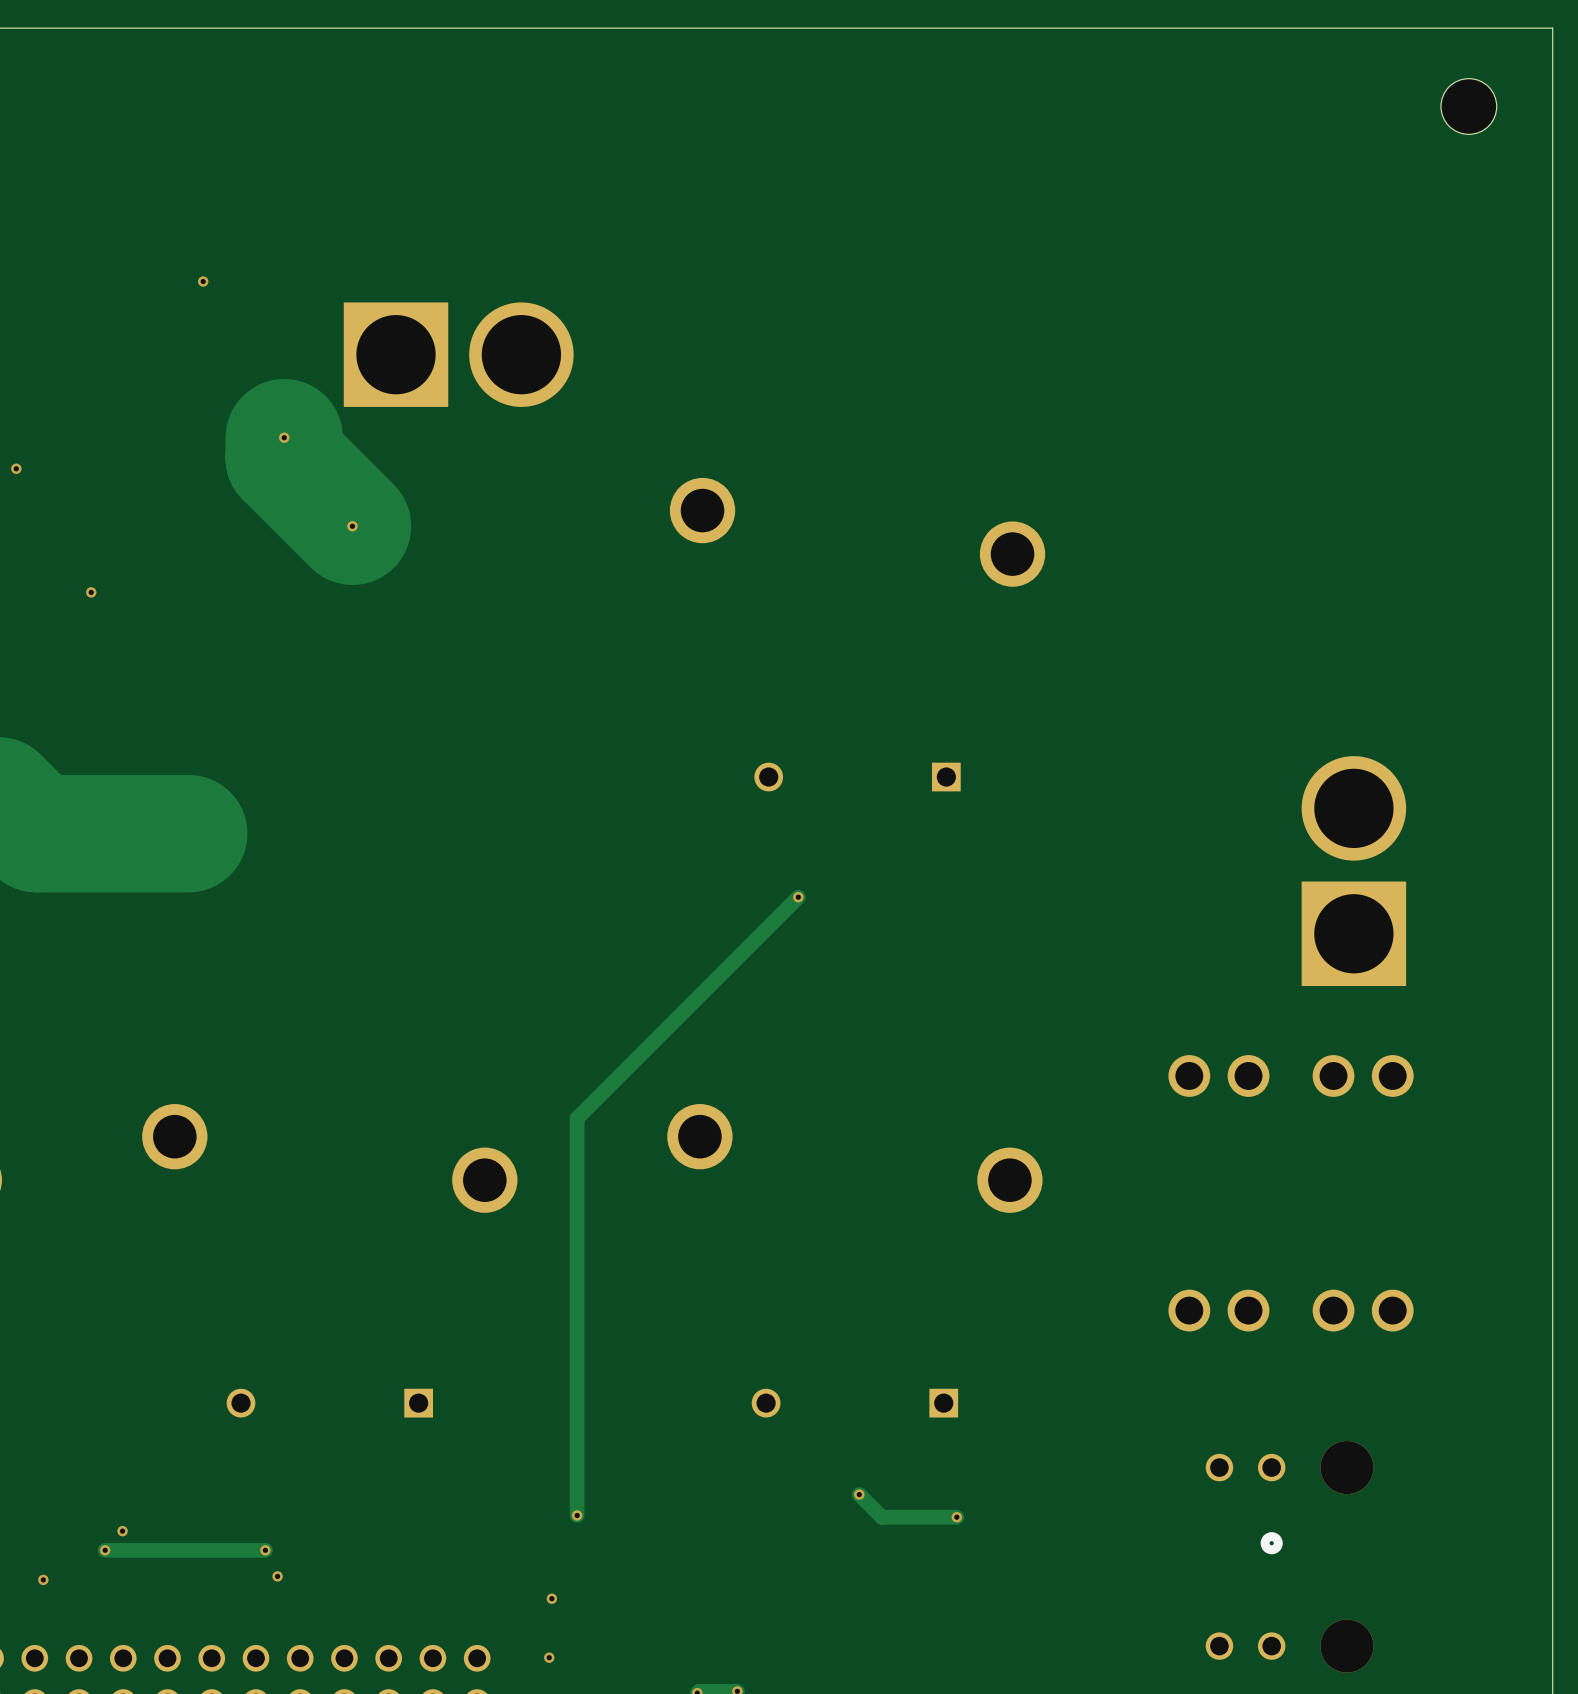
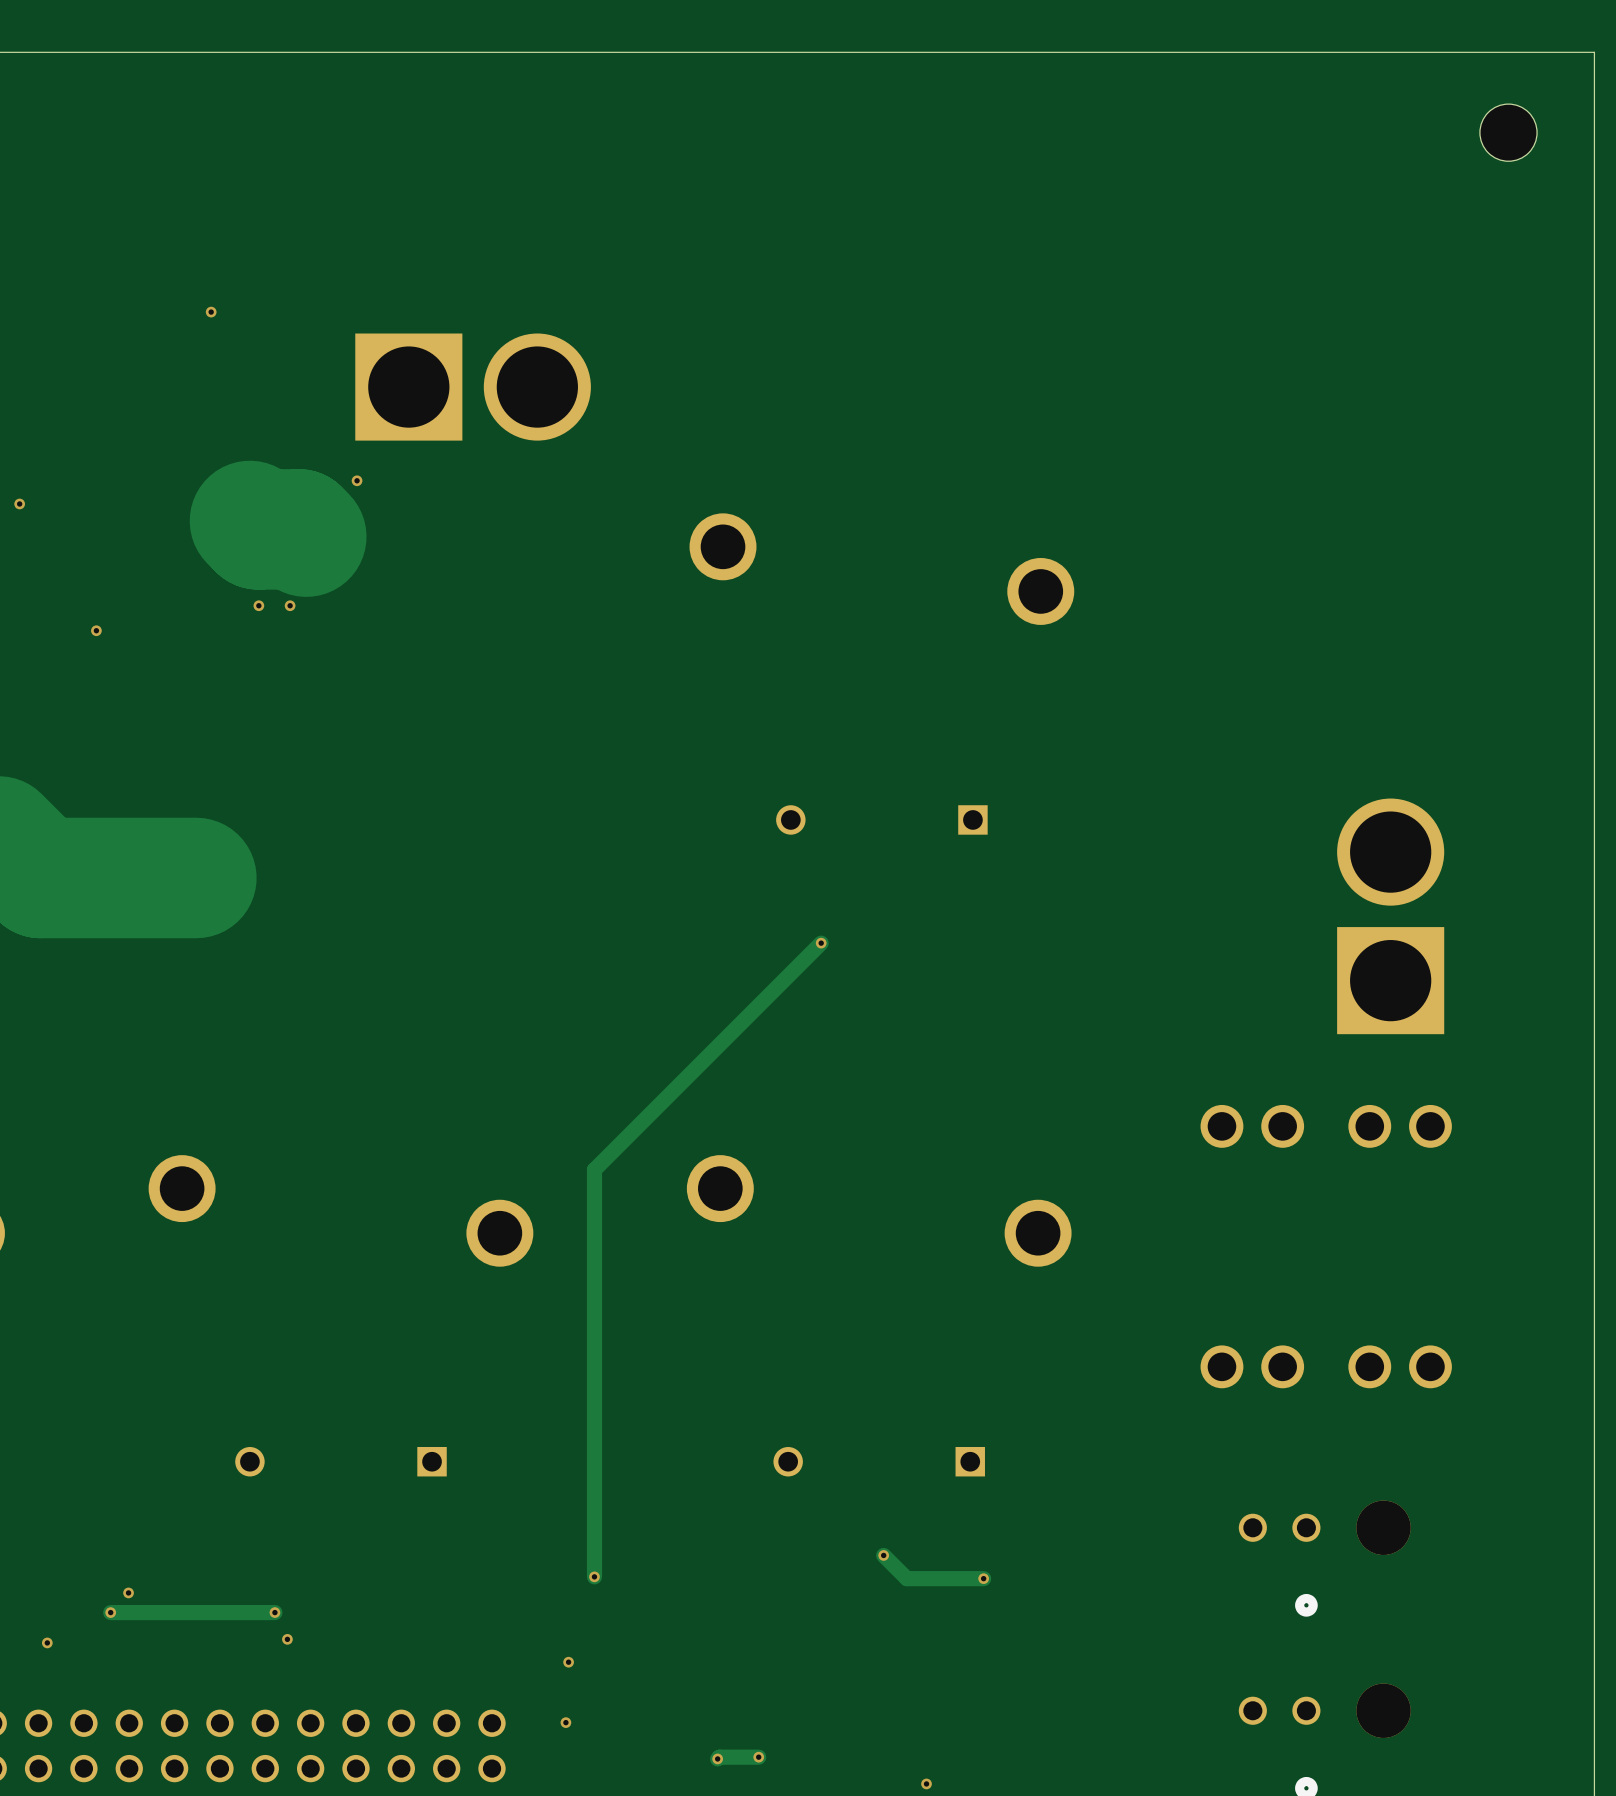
track: (284, 437) (284, 458) (352, 526) -> none
via: (284, 437) -> none
via: none -> (357, 480)
track: none -> (249, 520) (258, 529) (299, 529) (306, 536)
via: (352, 526) -> none
via: none -> (258, 605)
via: none -> (290, 605)

